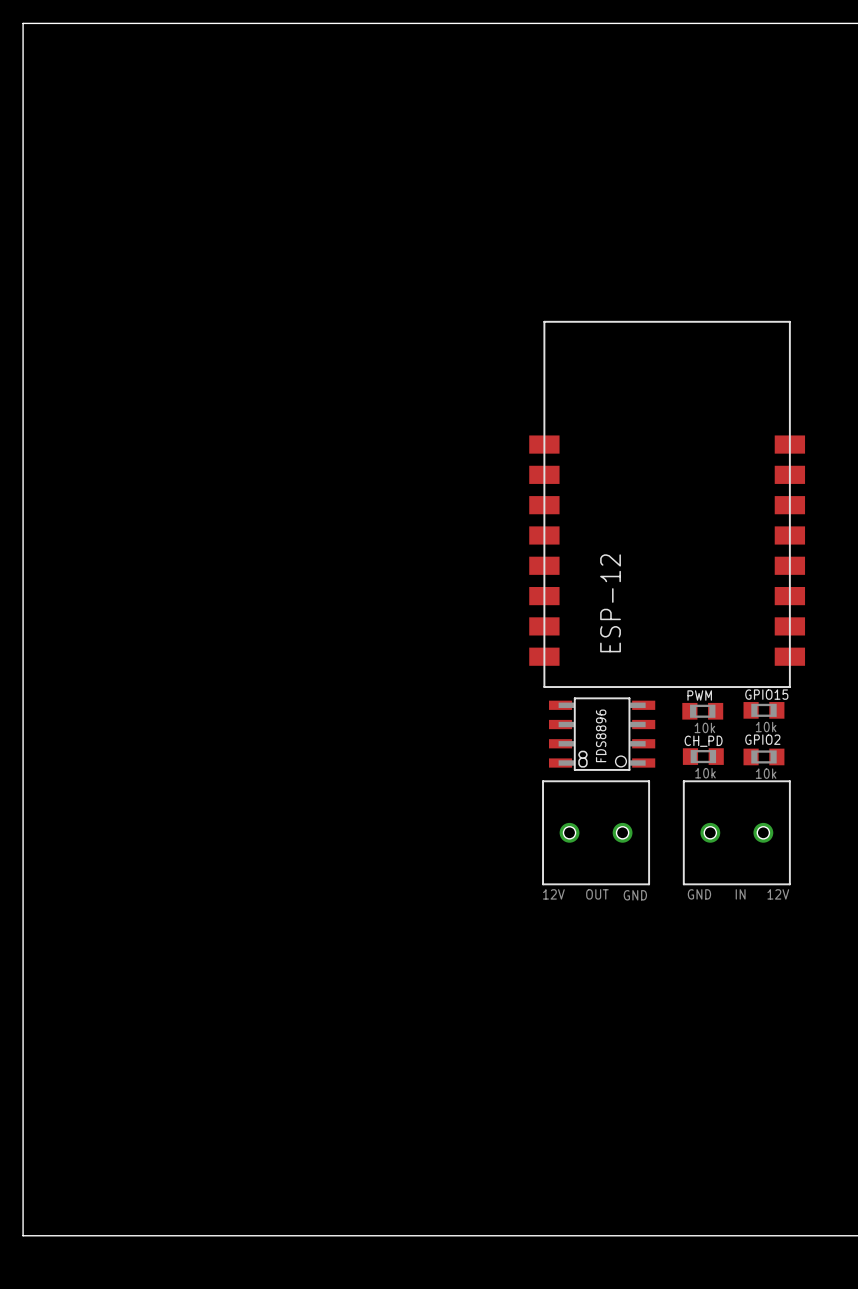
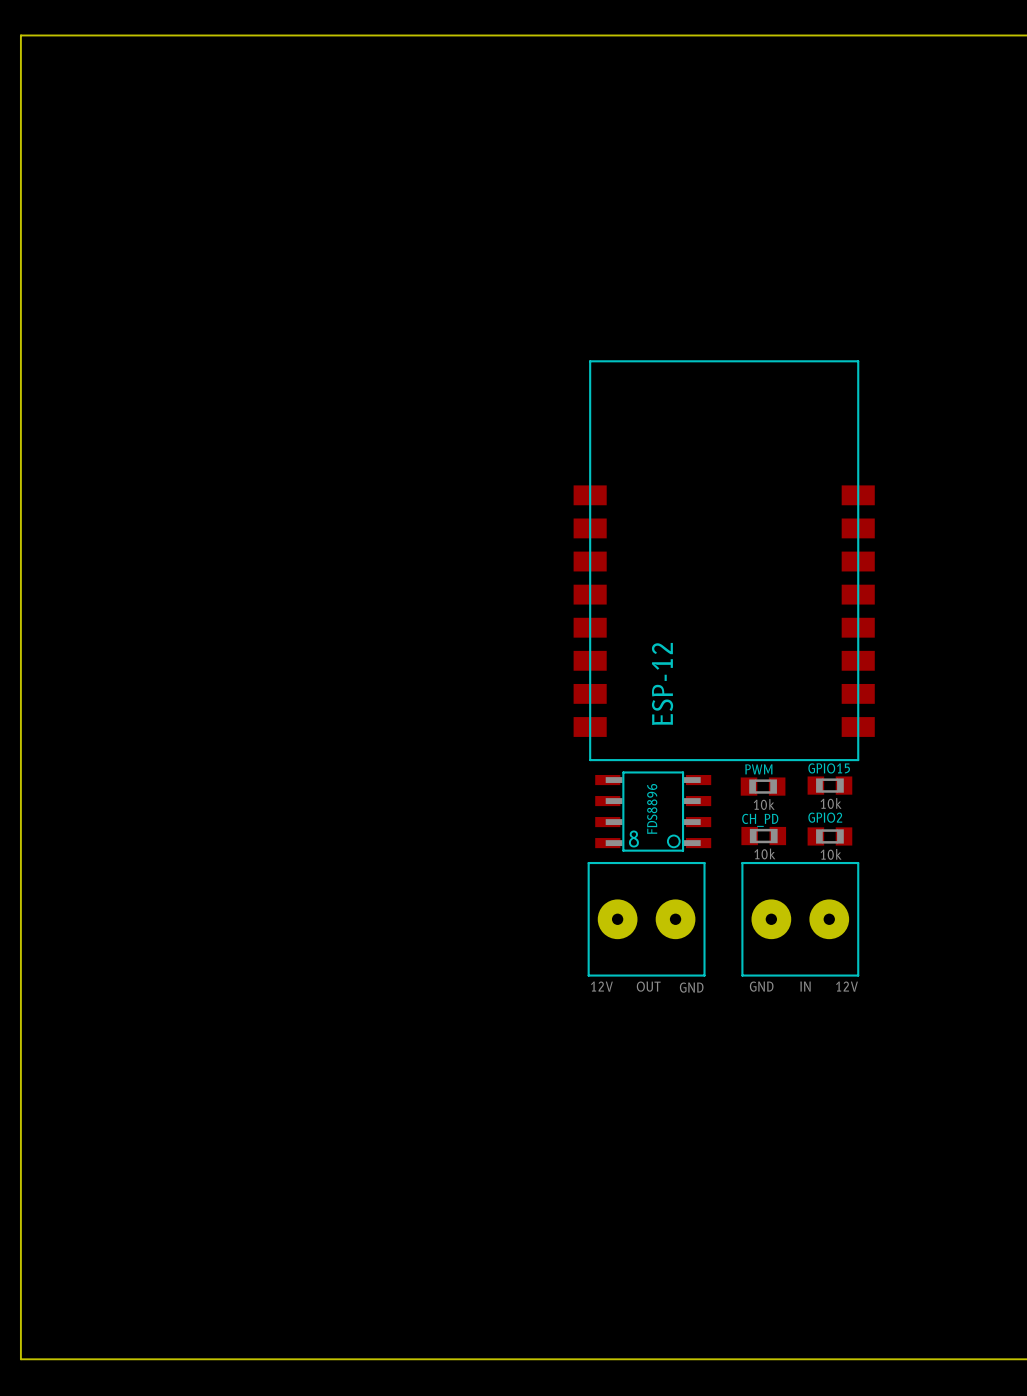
part footprint: [542, 780, 651, 886] -> [587, 861, 706, 977]
part footprint: [682, 780, 791, 886] -> [741, 861, 860, 977]

